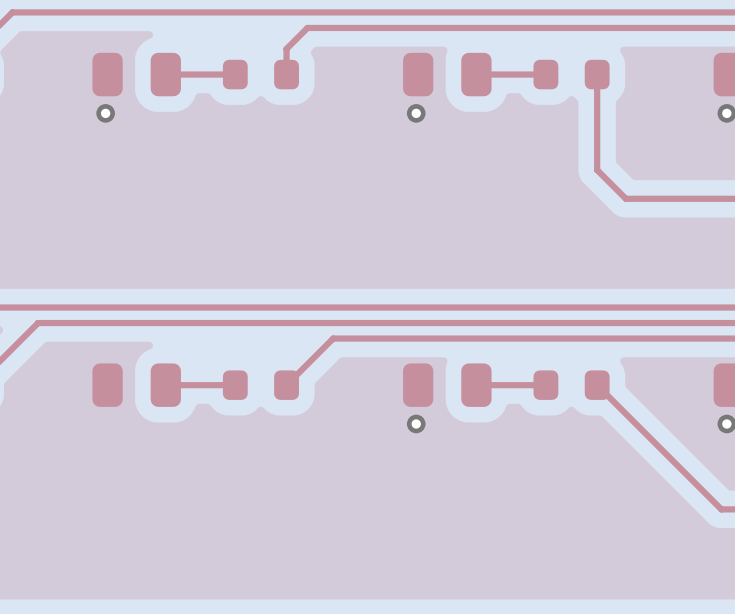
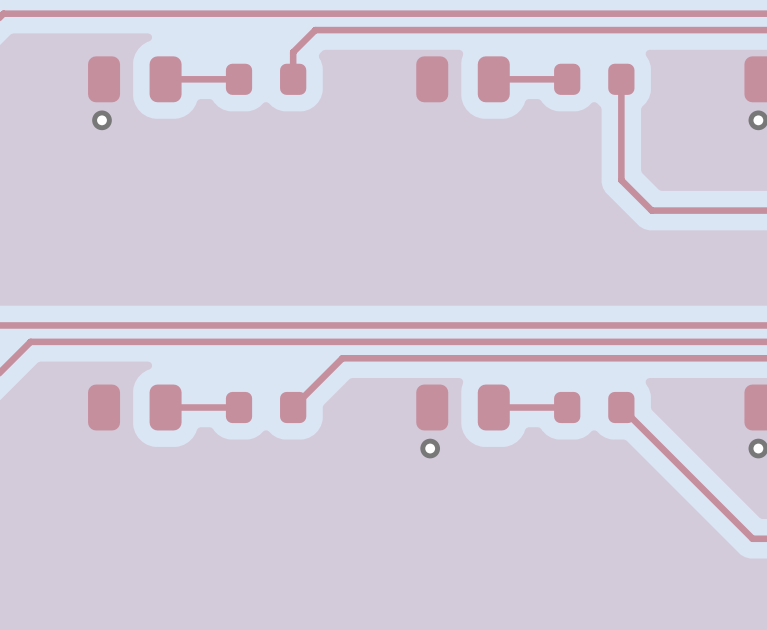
via: (416, 113) -> none

